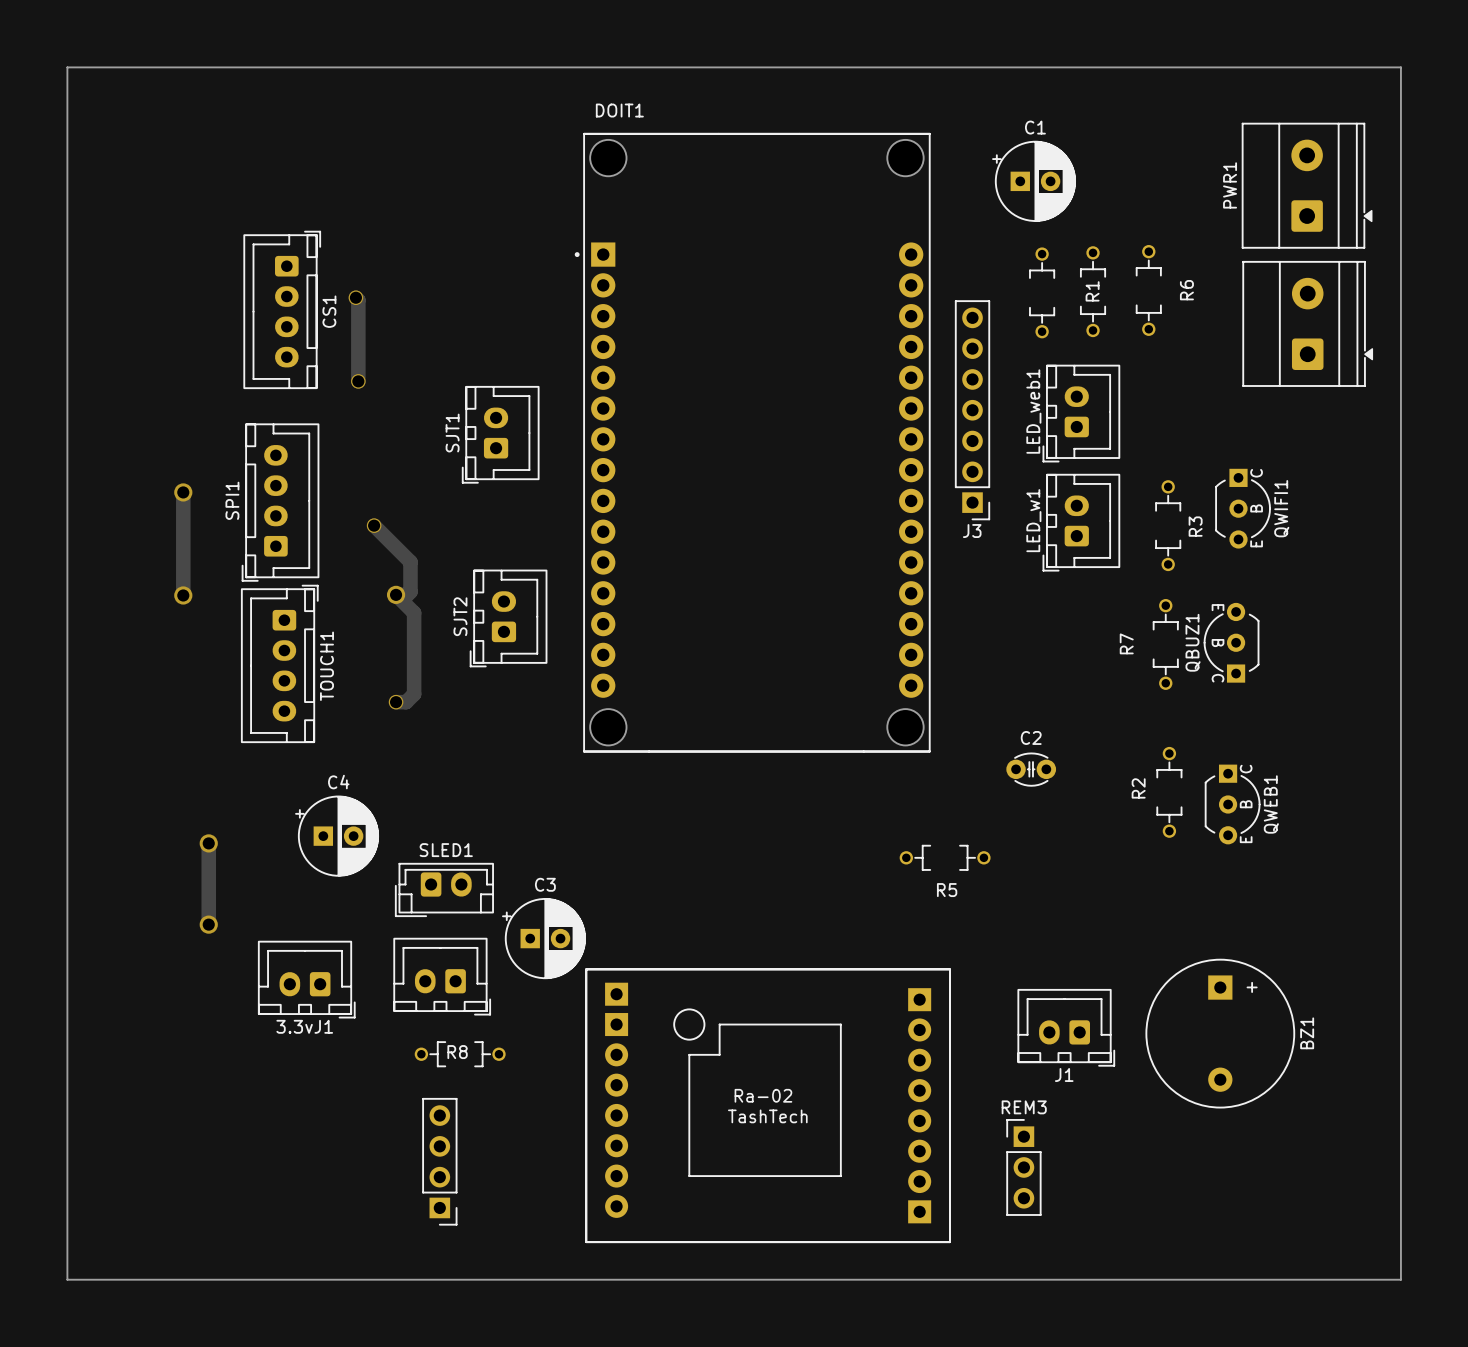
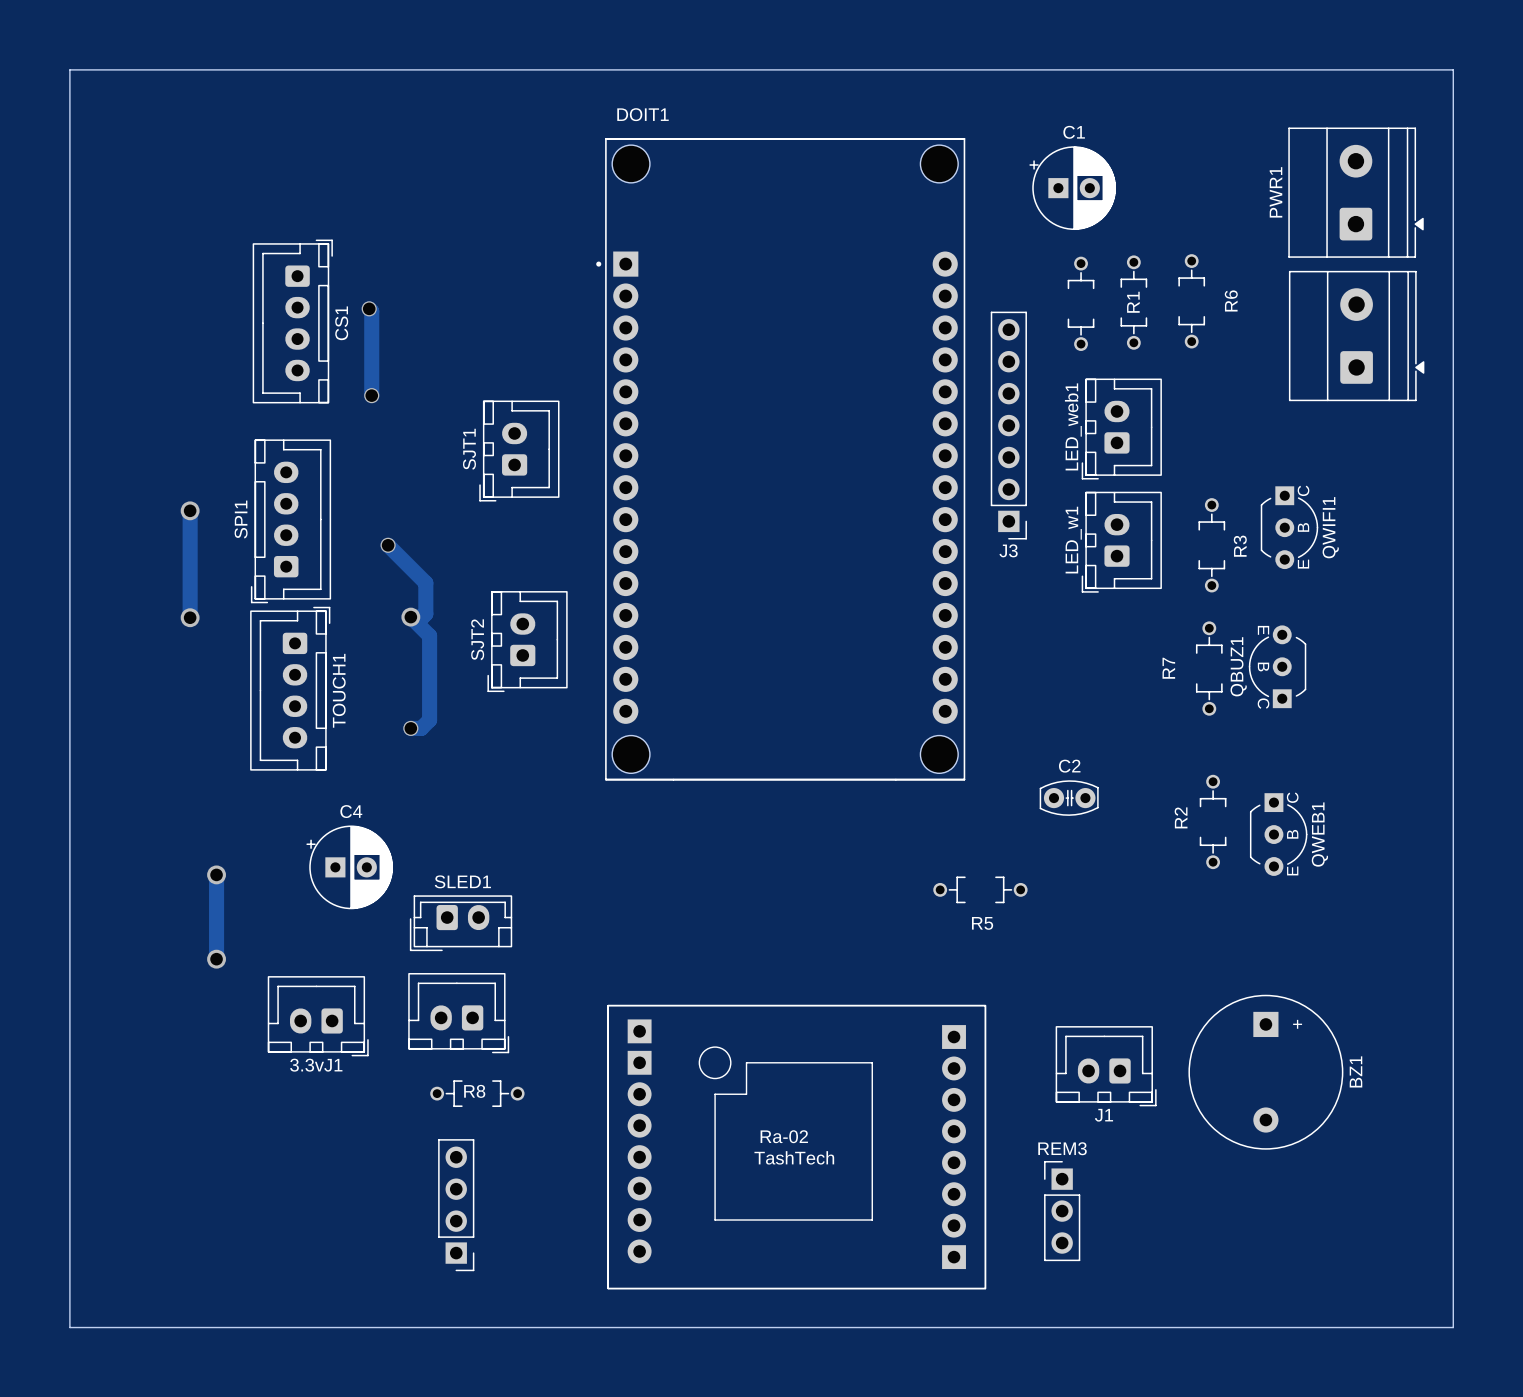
C2 footprint: [1006, 752, 1057, 787] -> [1039, 780, 1099, 816]
C3: (543, 938) -> none

